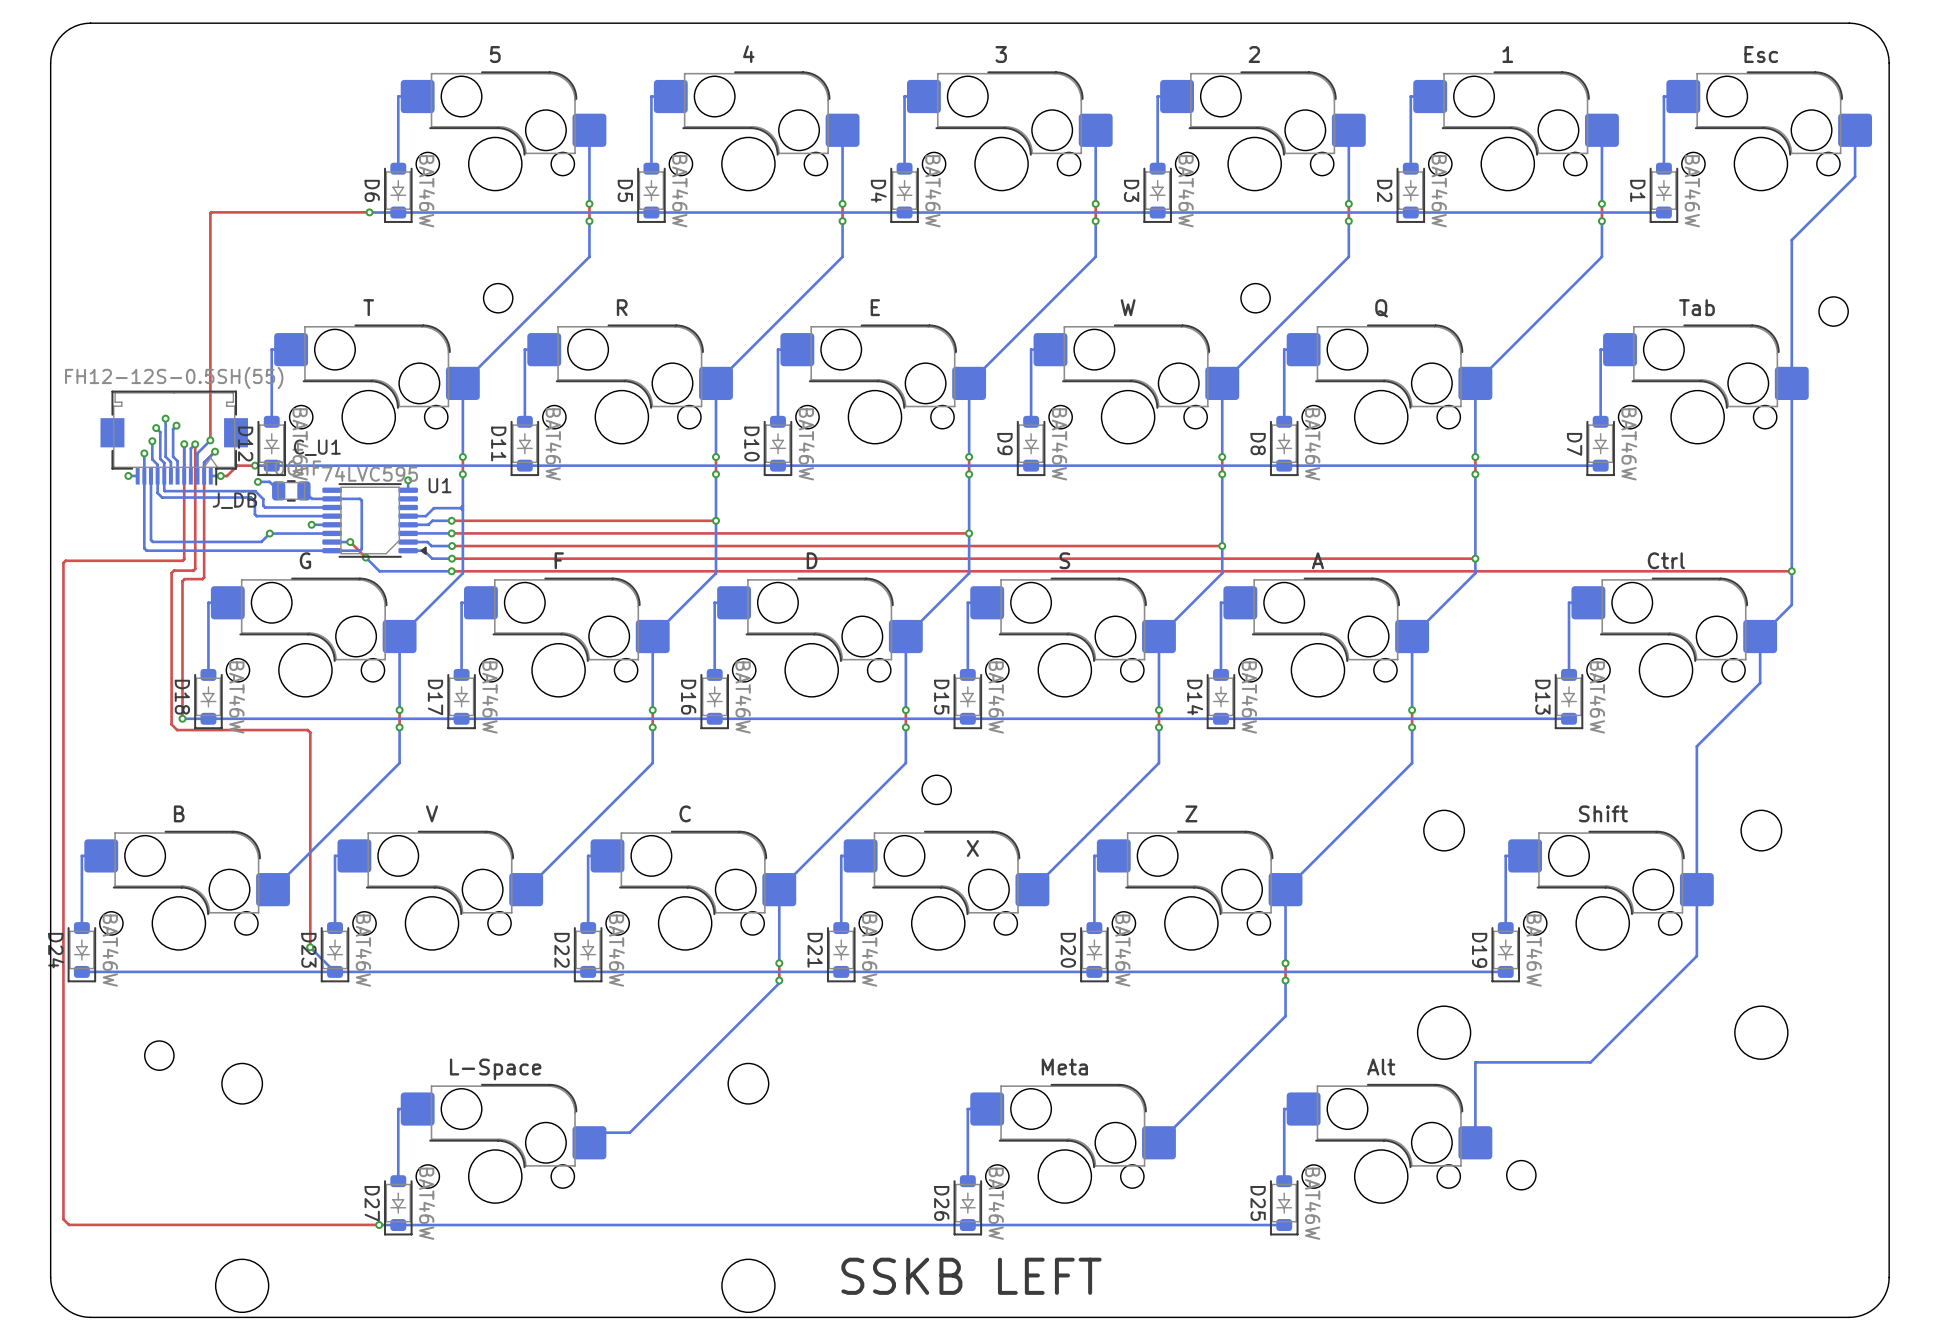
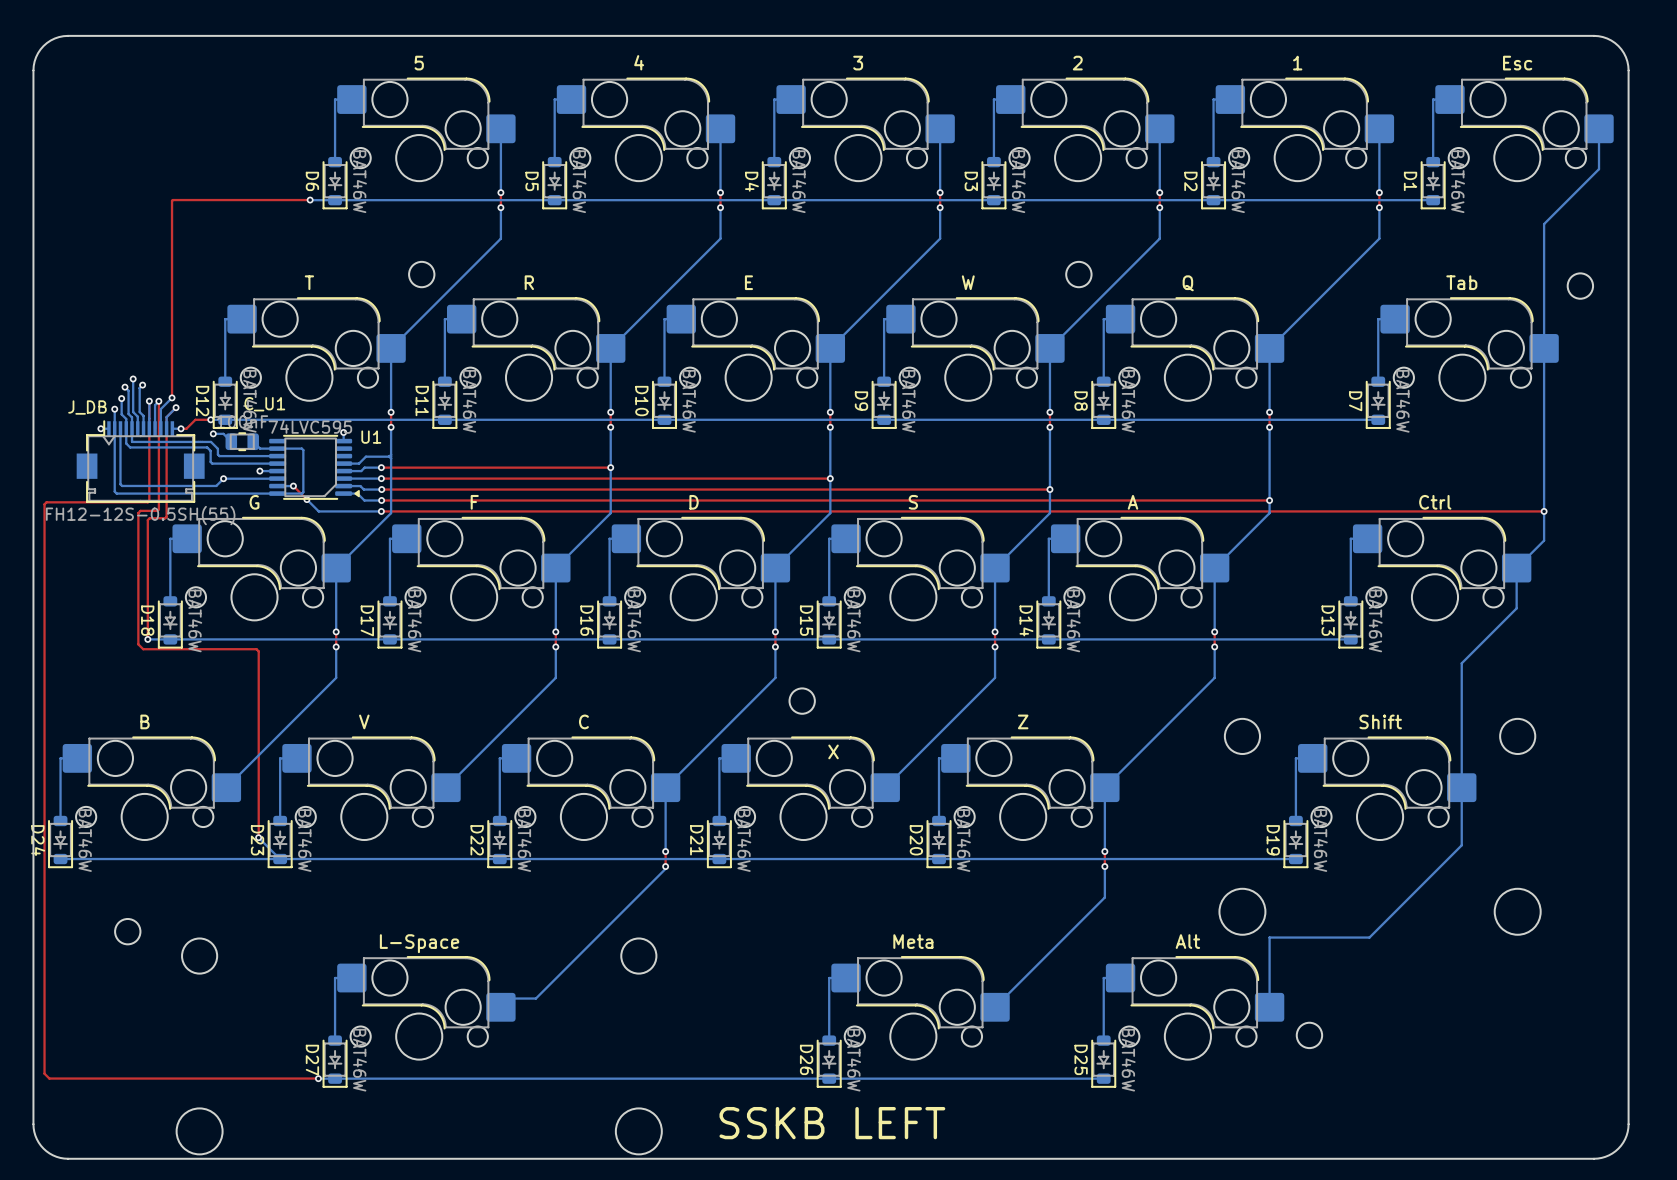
J_DB rotation: 0° (174, 438) -> 180° (140, 461)

